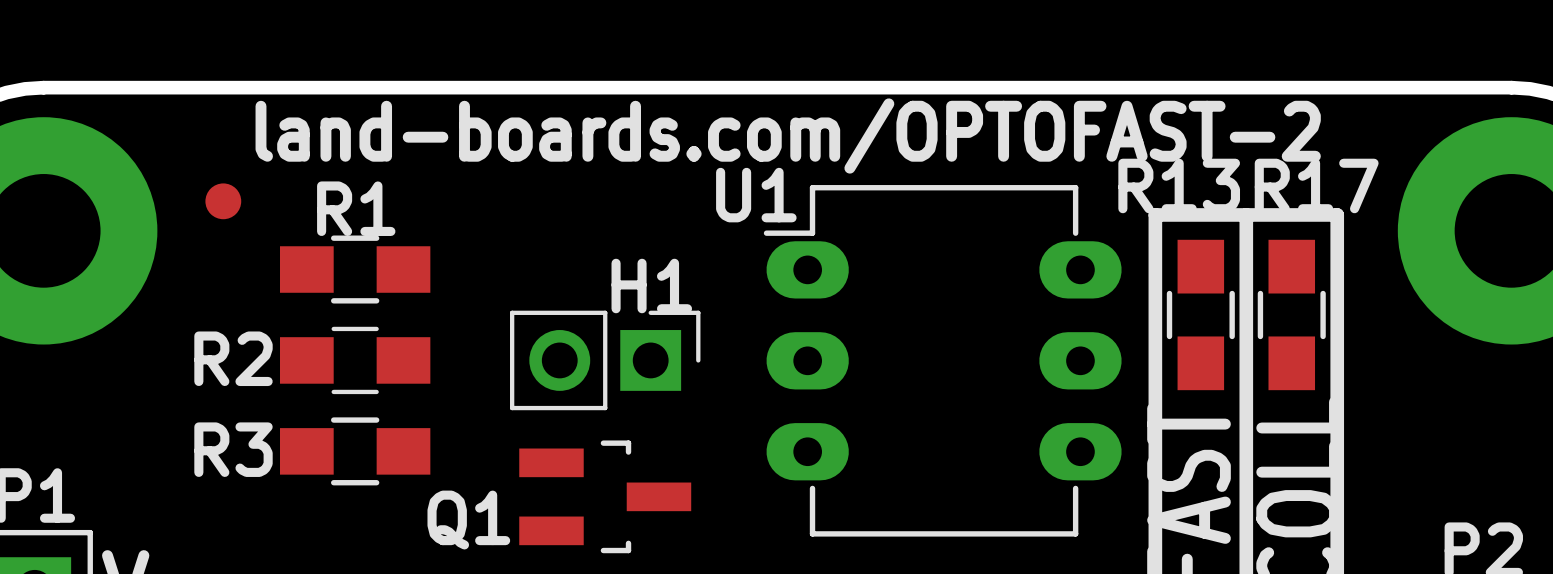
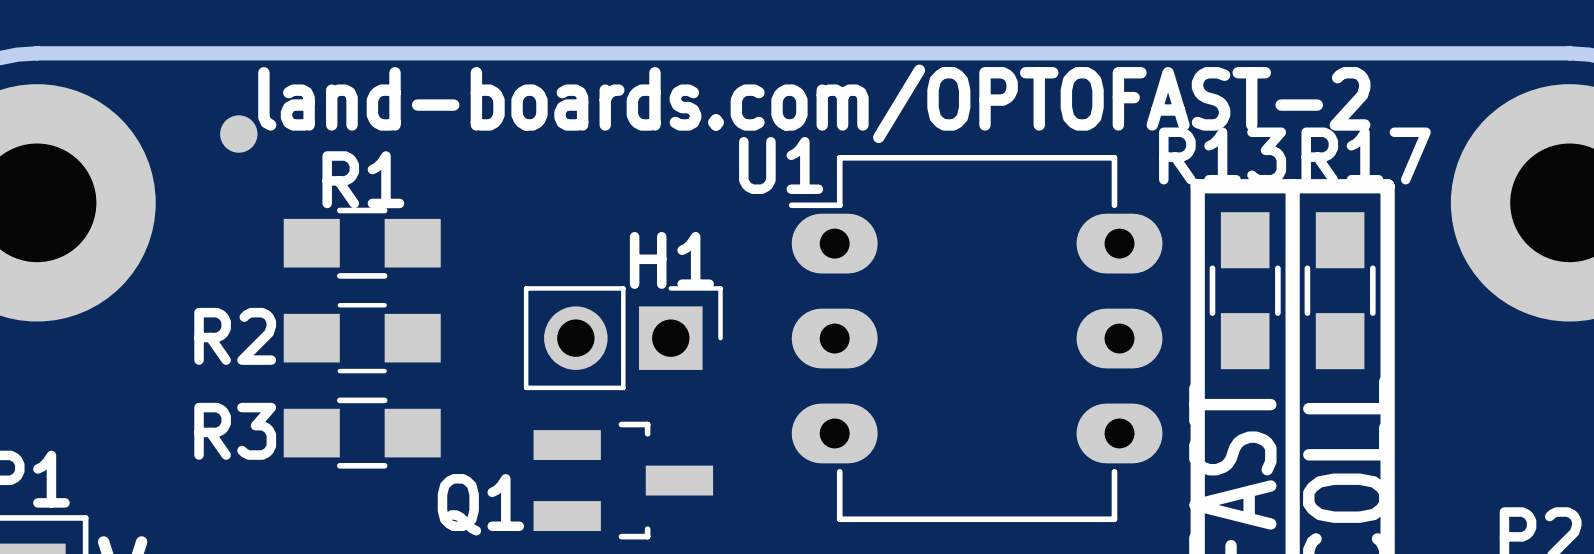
part position: (223, 201) -> (238, 134)

